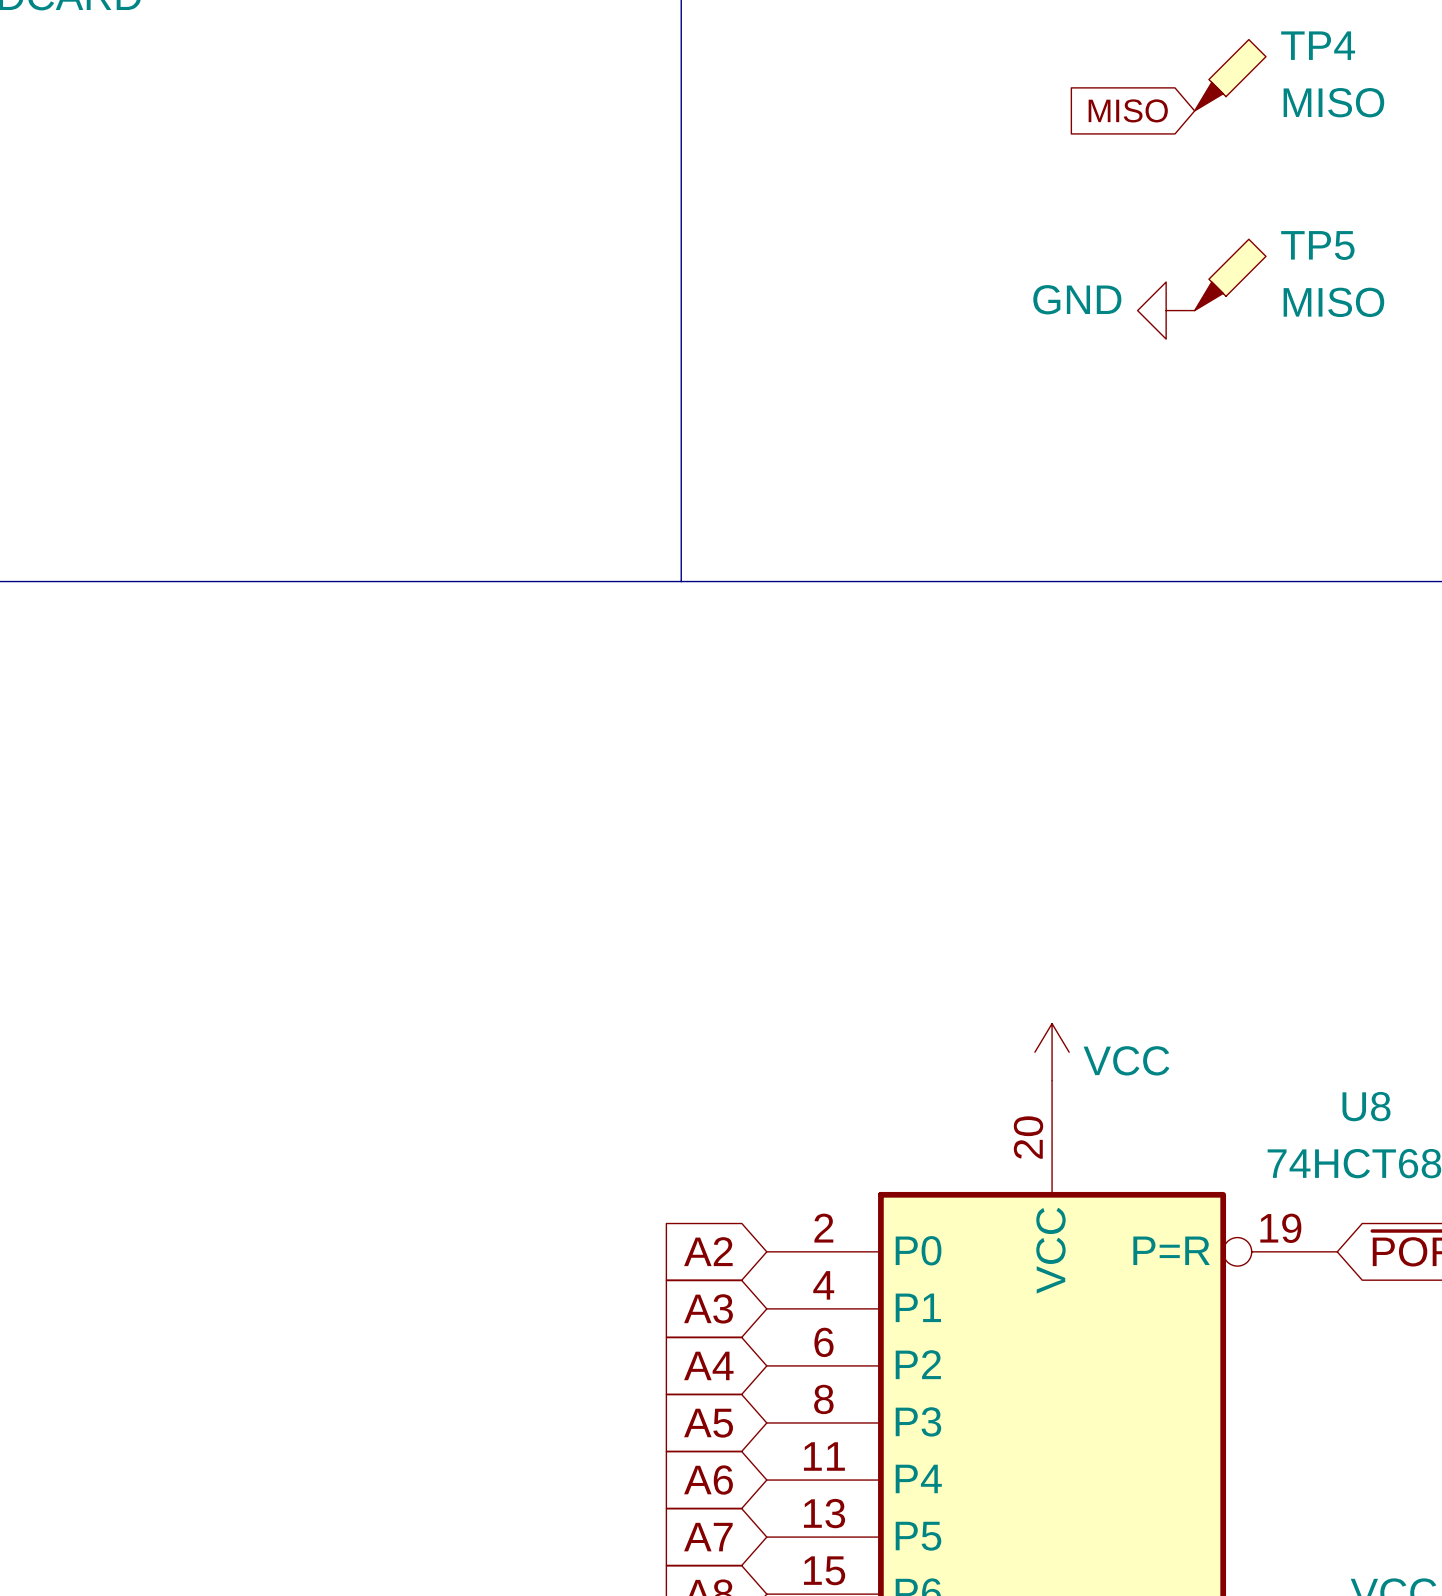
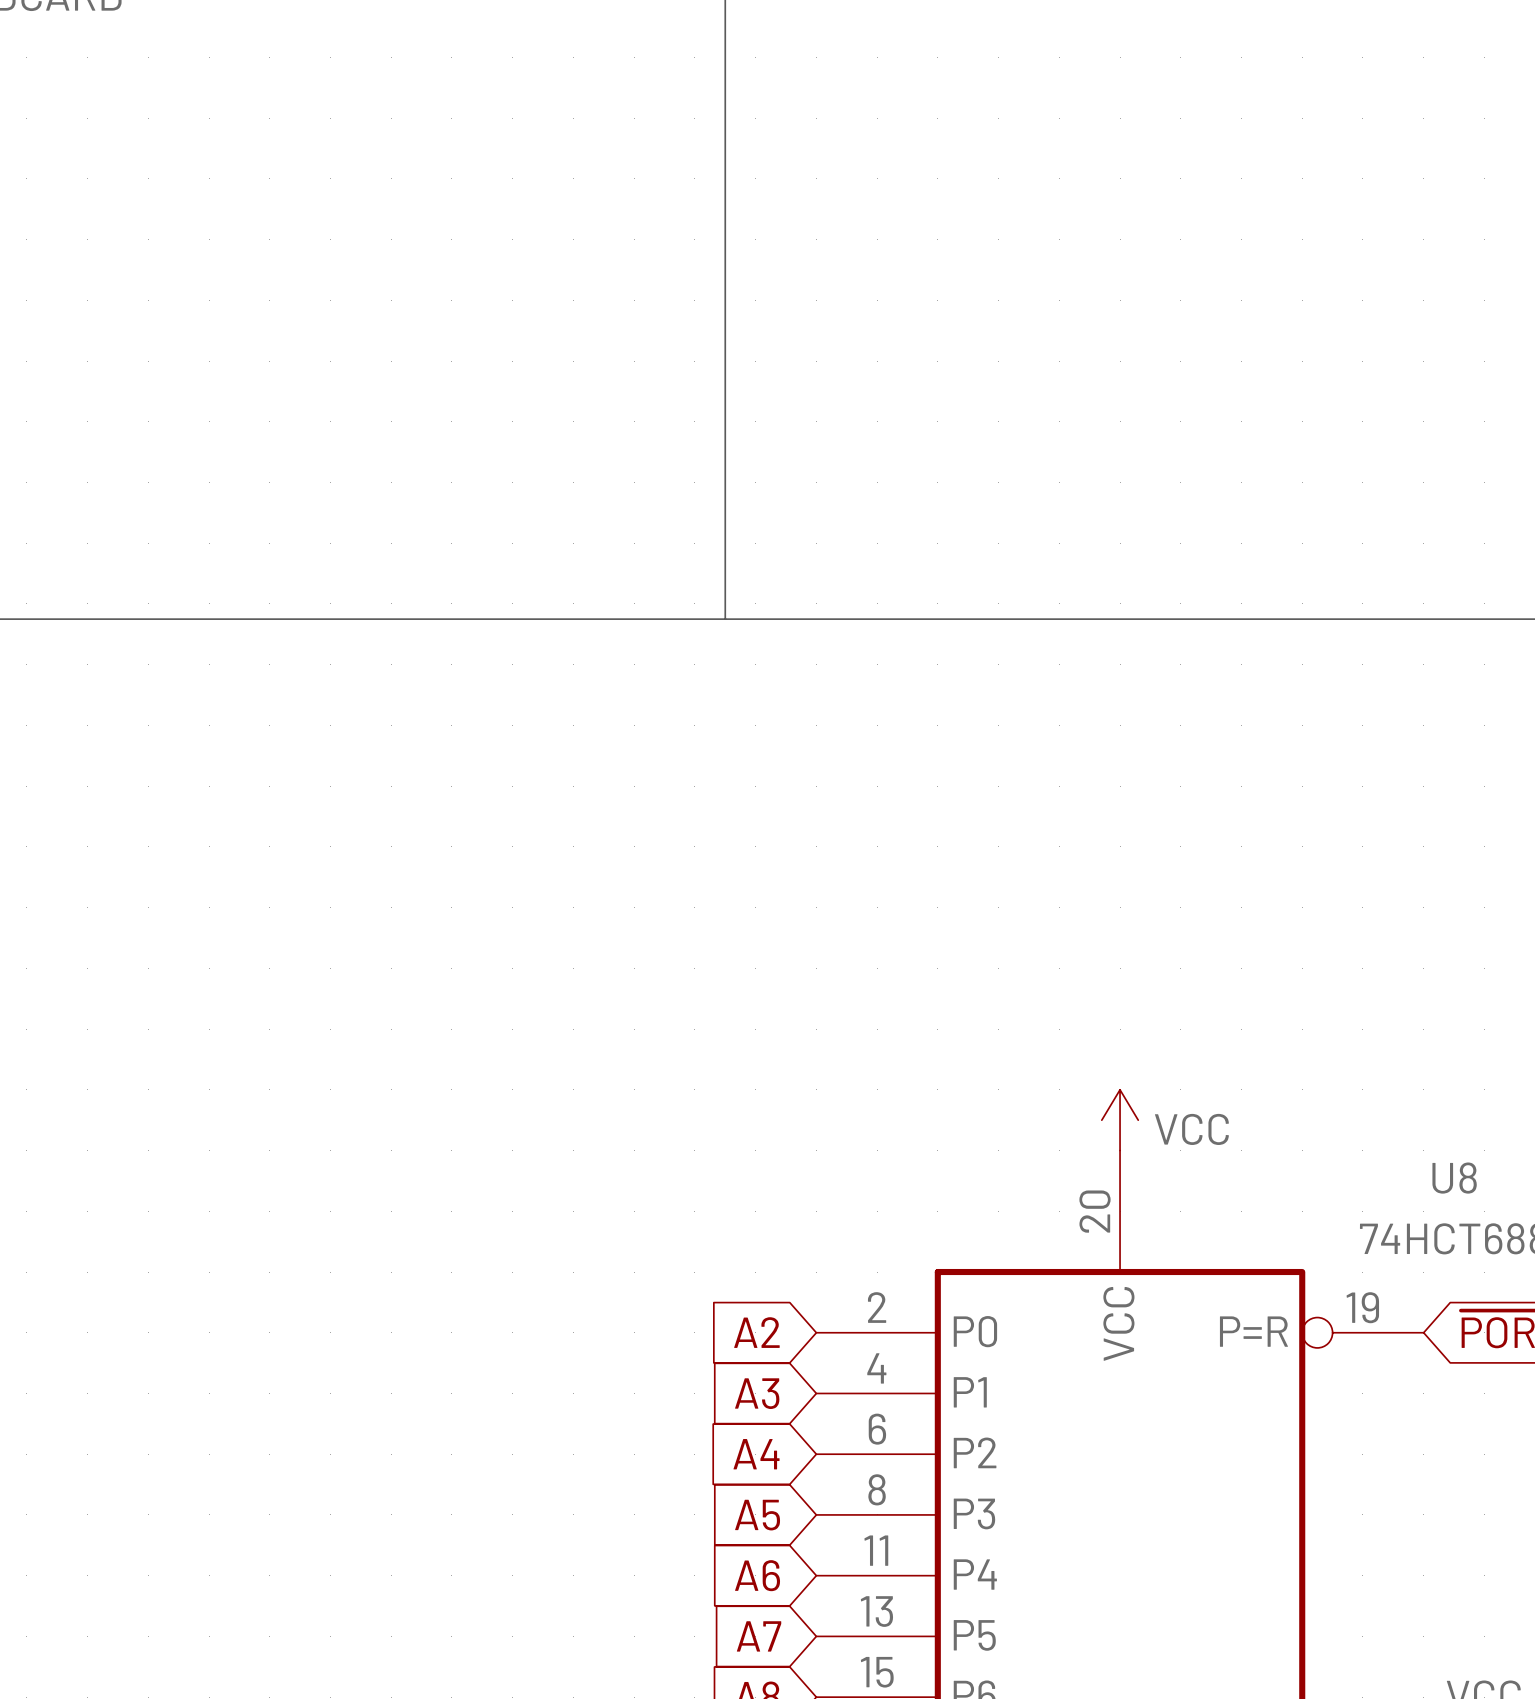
TP4: MISO (1230, 75) -> none
global label: MISO (1128, 110) -> none
TP5: MISO (1230, 274) -> none
power symbol: GND (1166, 310) -> none

